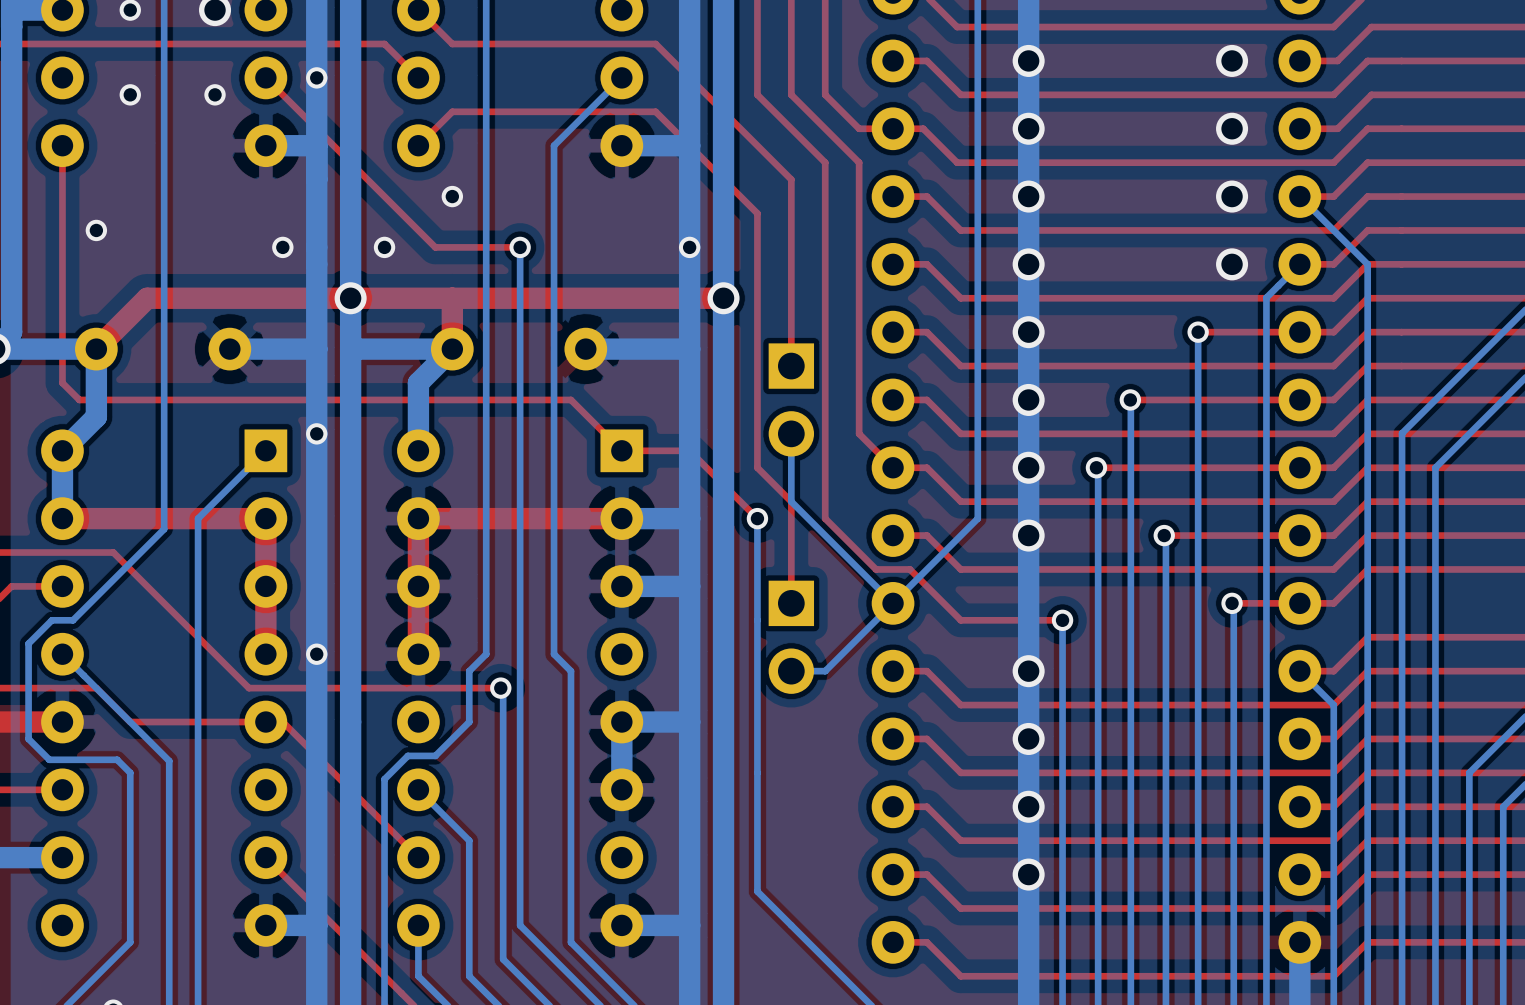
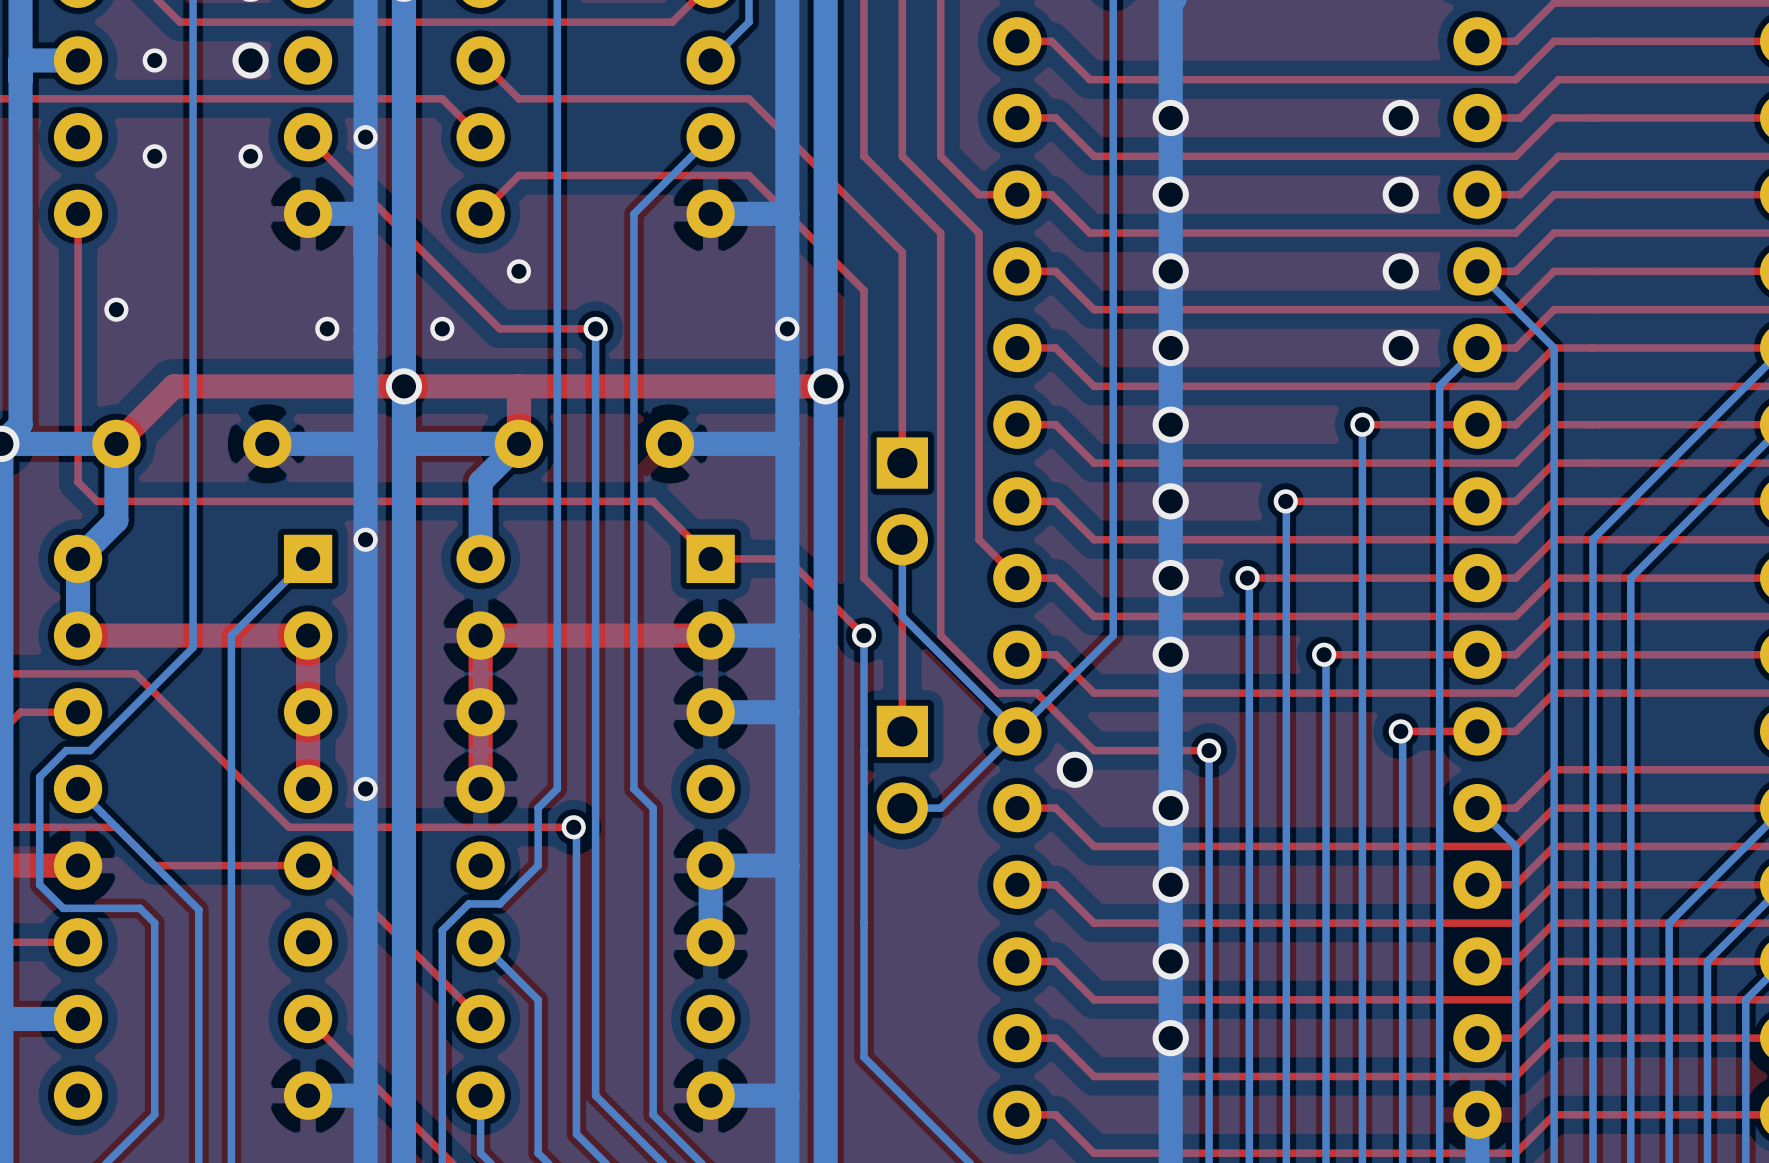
via: none -> (1074, 769)

